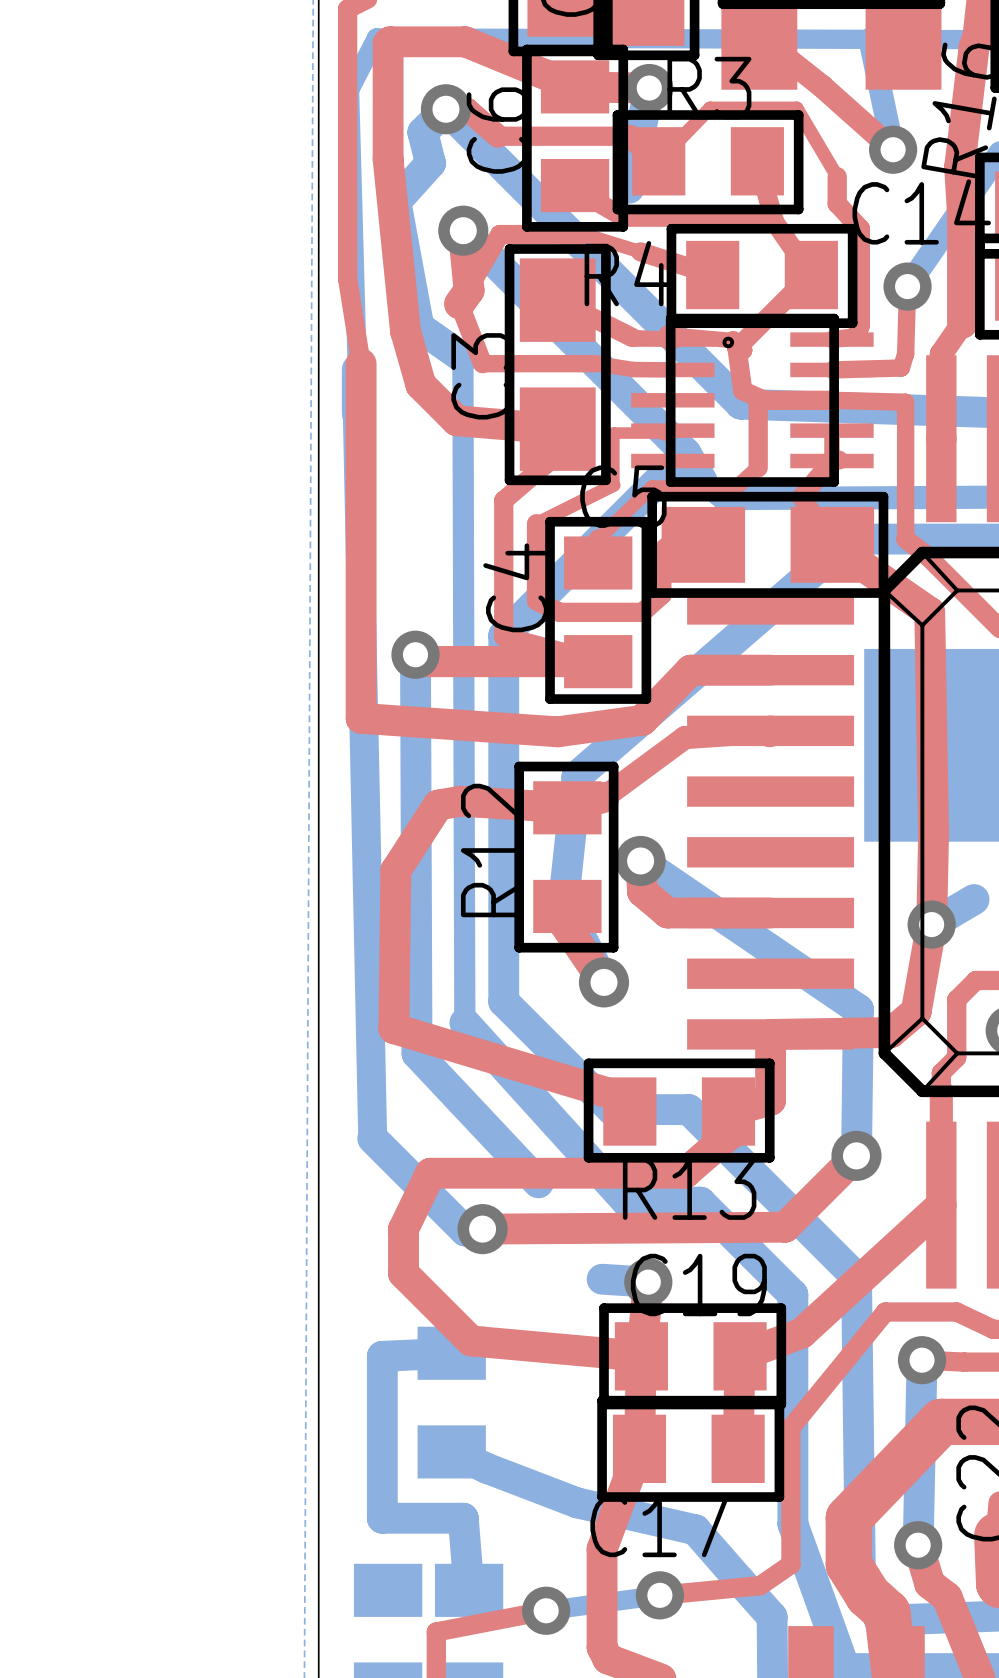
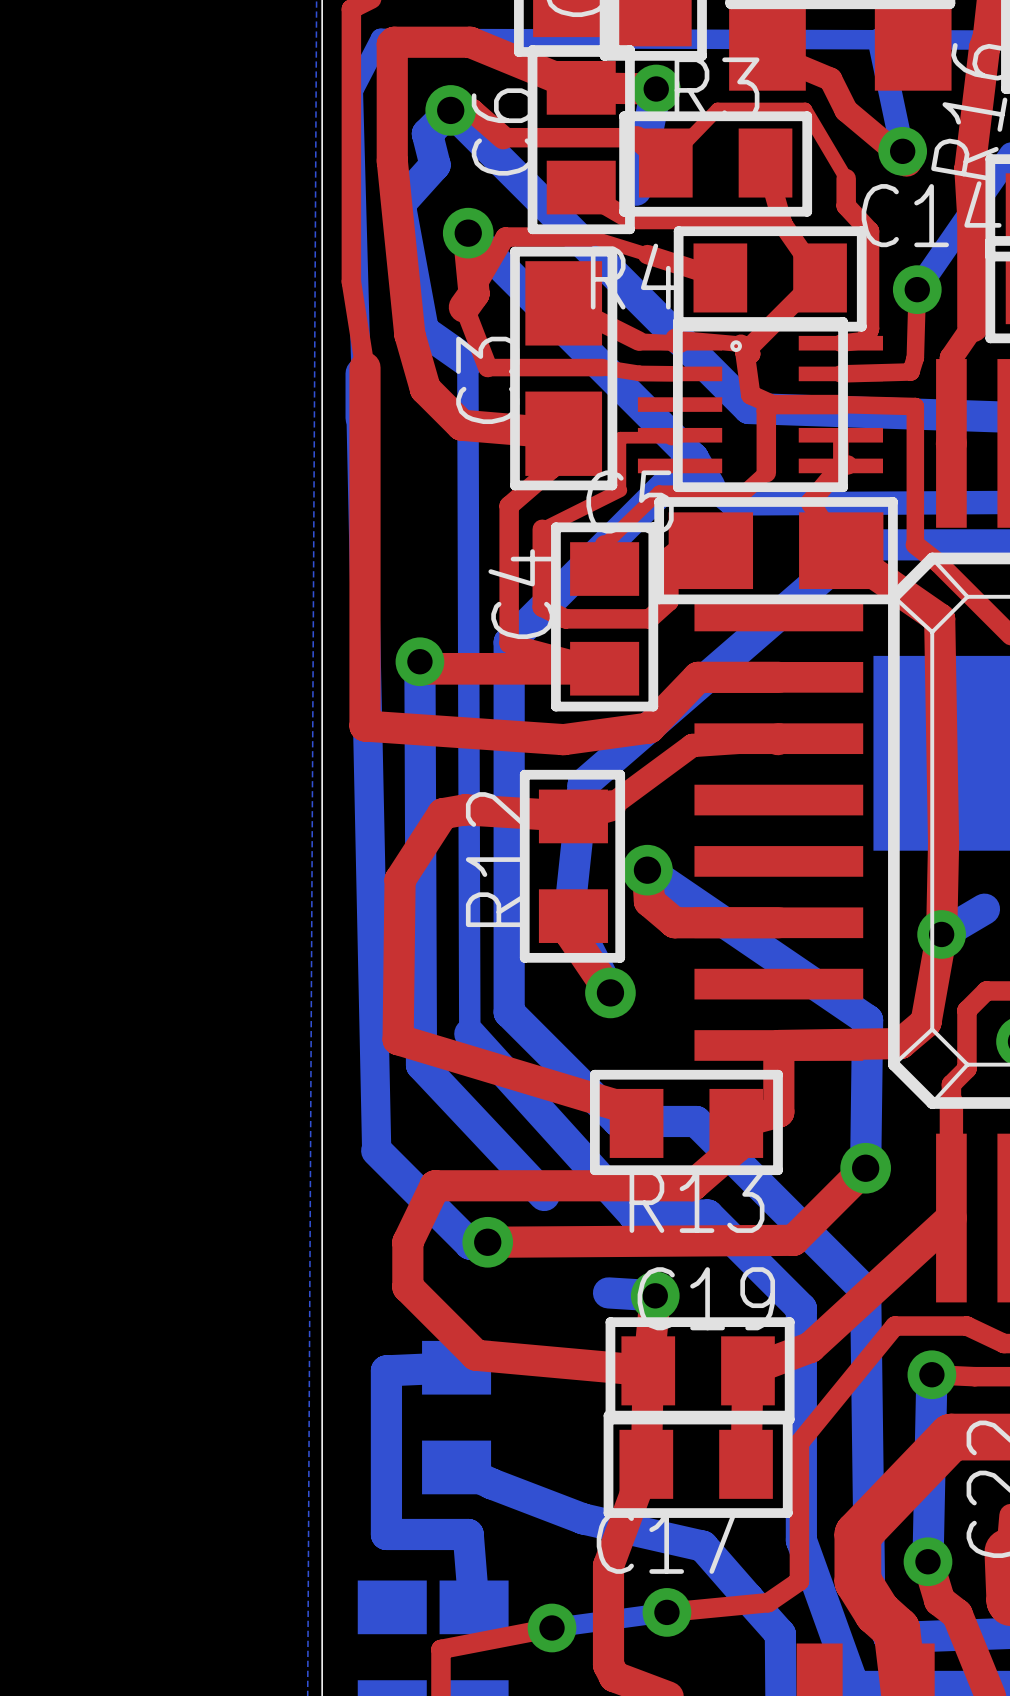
top track: (759, 36) (821, 86) (893, 149) -> (757, 48) (830, 79) (846, 110) (906, 161) (902, 151)

